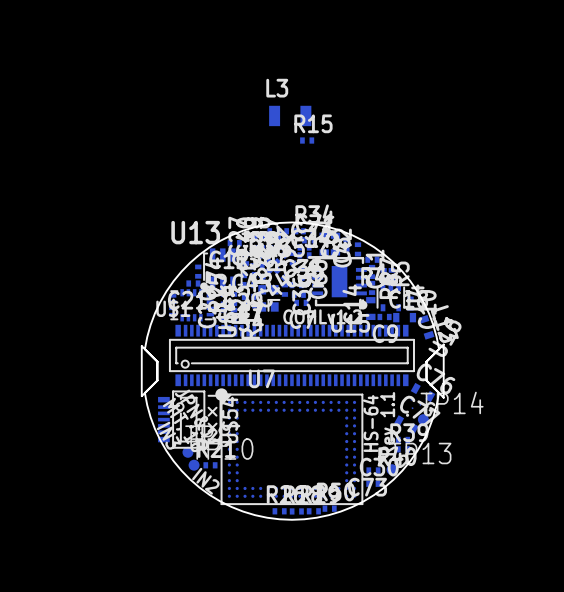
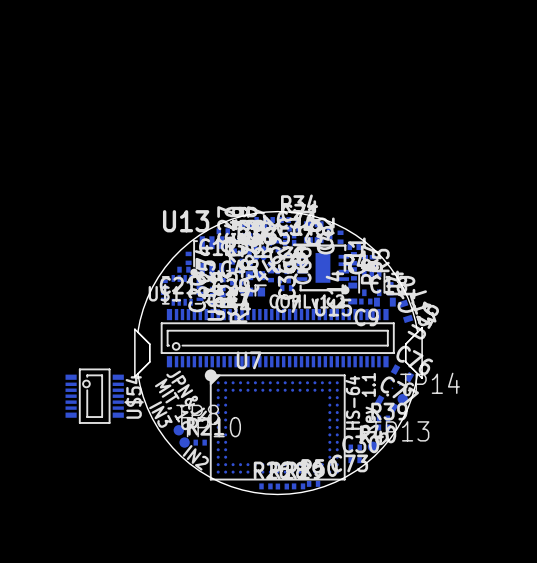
L3: (290, 115) -> none
R15: (307, 140) -> none
U$54 footprint: [158, 390, 222, 449] -> [65, 368, 124, 424]

